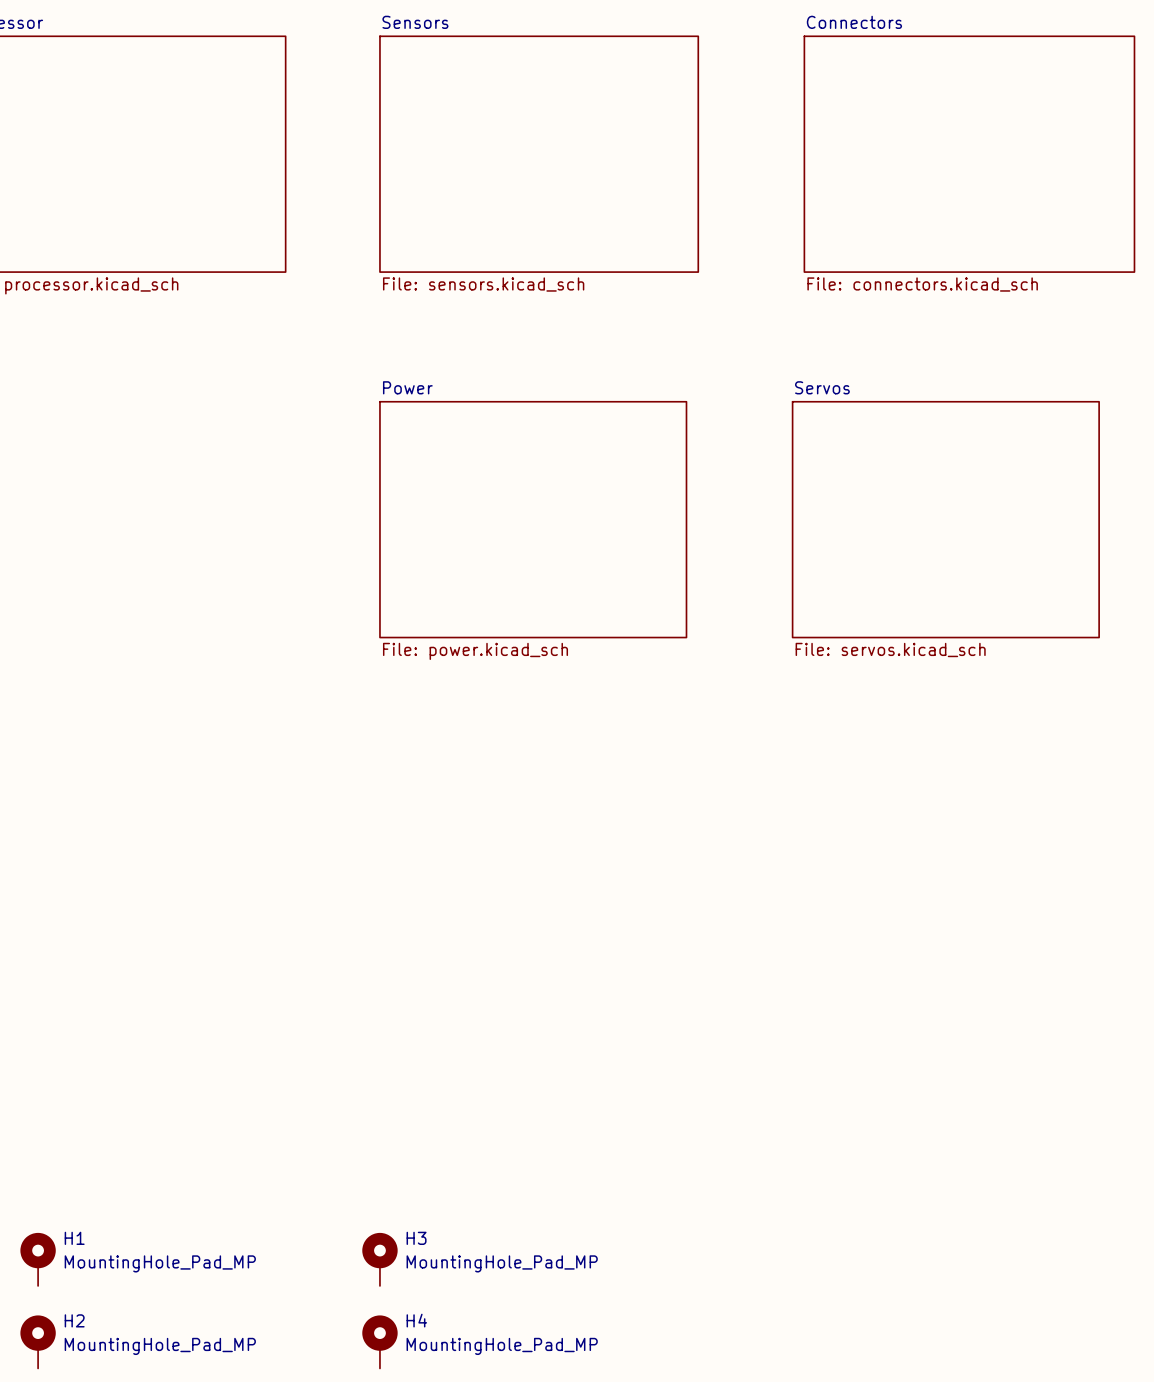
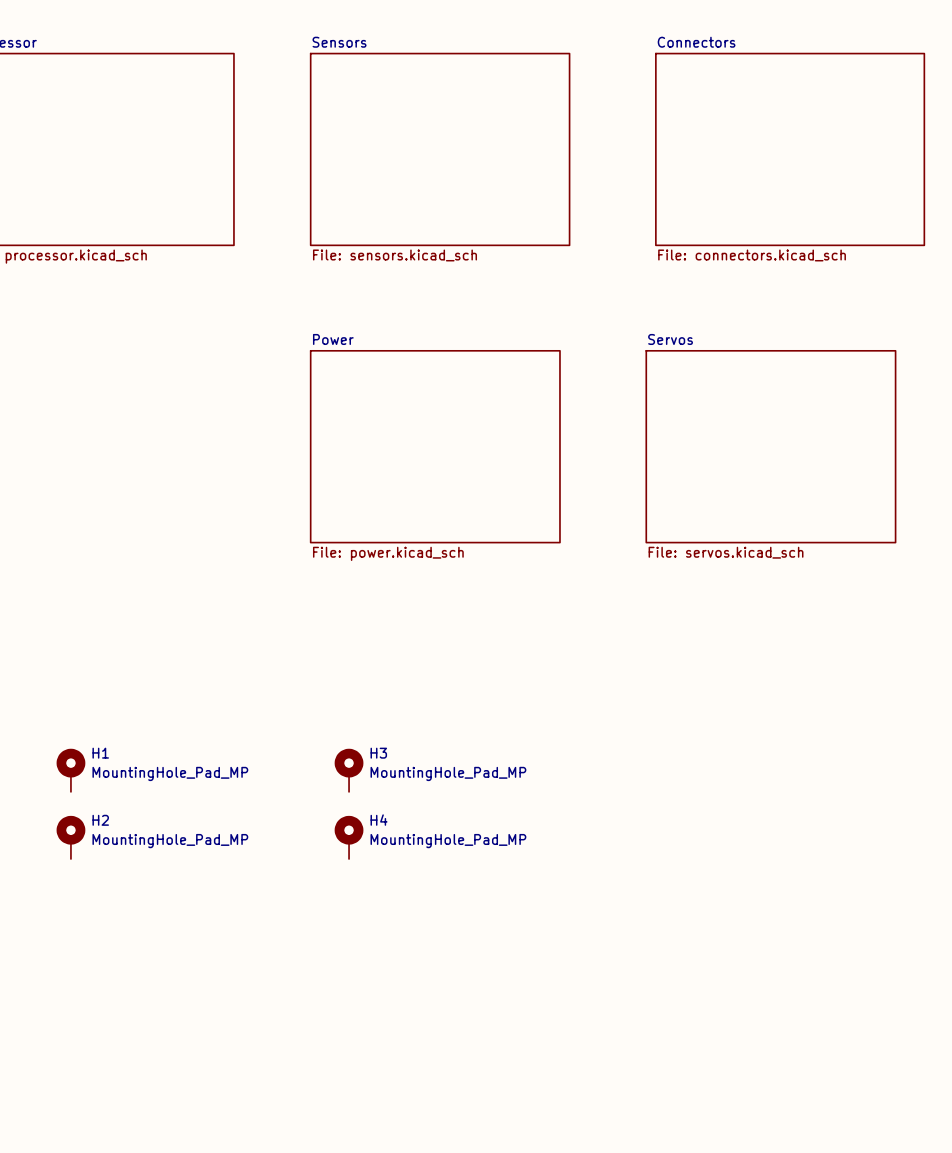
H1 position: (38, 1259) -> (70, 770)
H3 position: (379, 1259) -> (349, 770)
H2 position: (38, 1341) -> (70, 837)
H4 position: (379, 1341) -> (349, 837)

